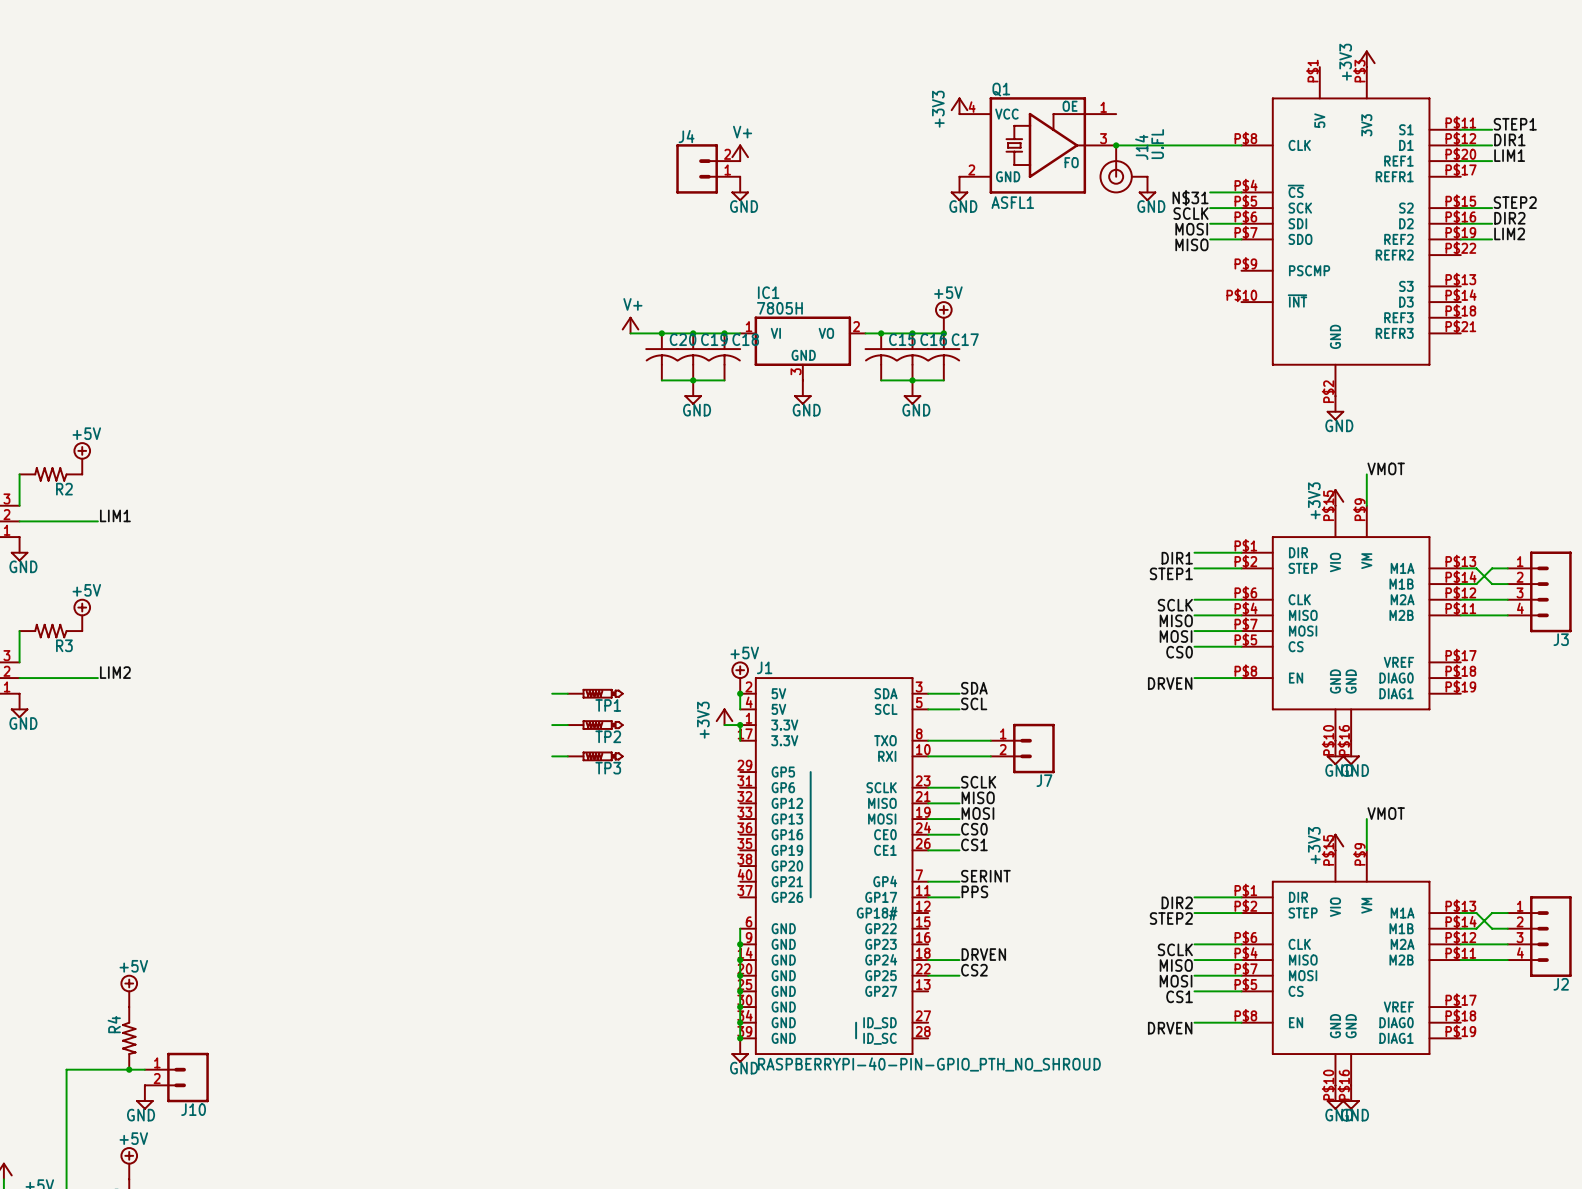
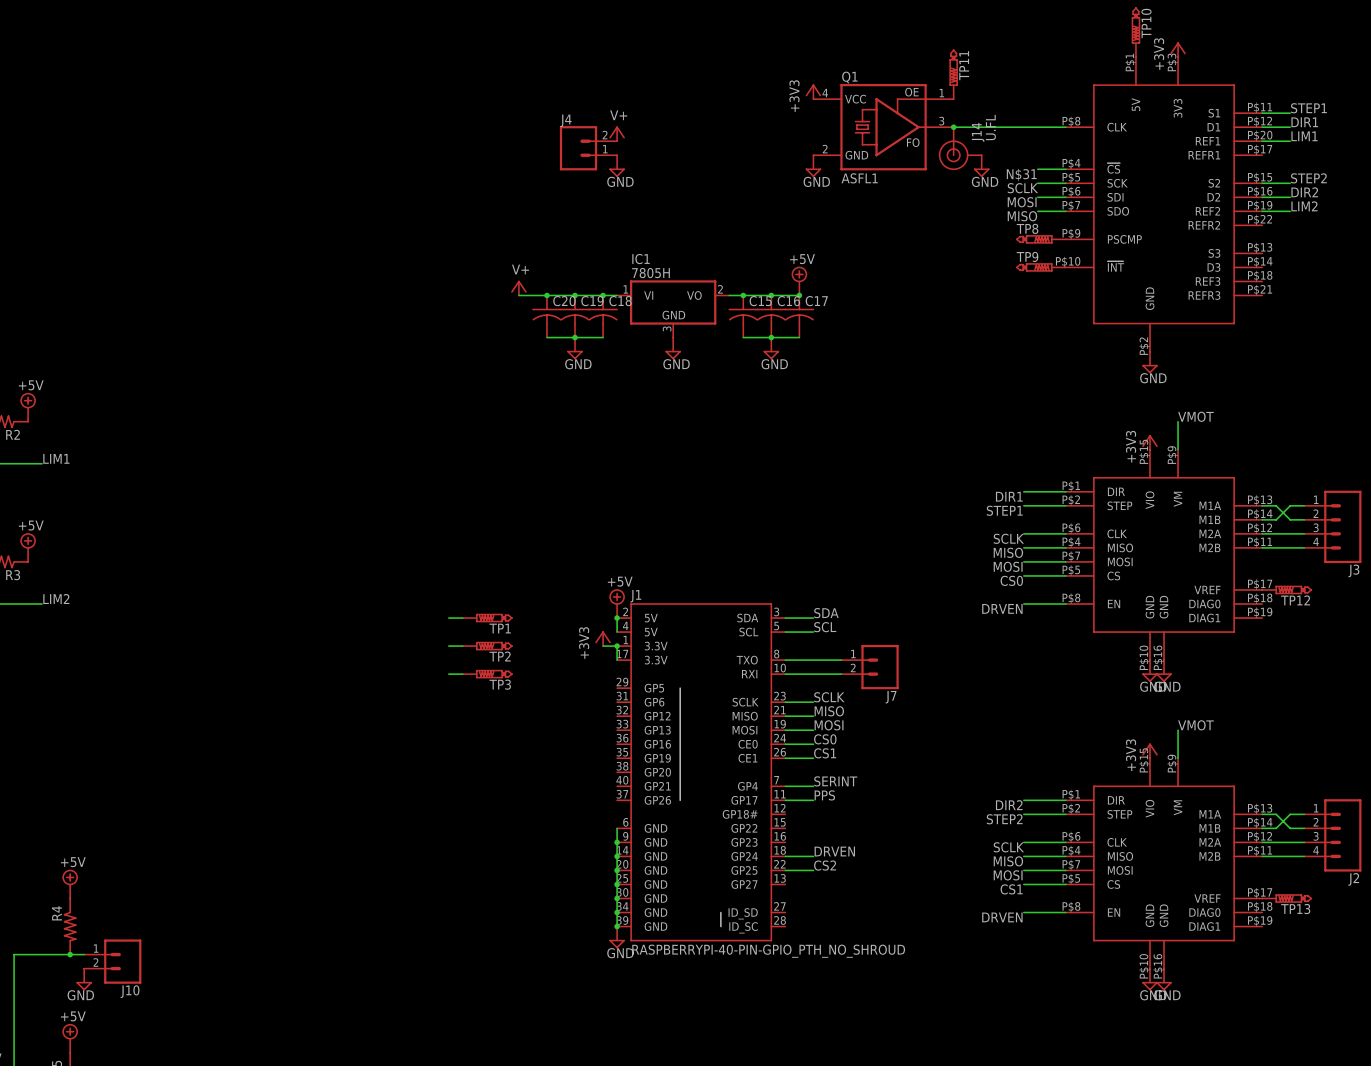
TP10: none -> (1135, 32)
TP11: none -> (953, 74)
TP8: none -> (1041, 239)
TP9: none -> (1041, 267)
TP12: none -> (1286, 589)
TP13: none -> (1286, 898)

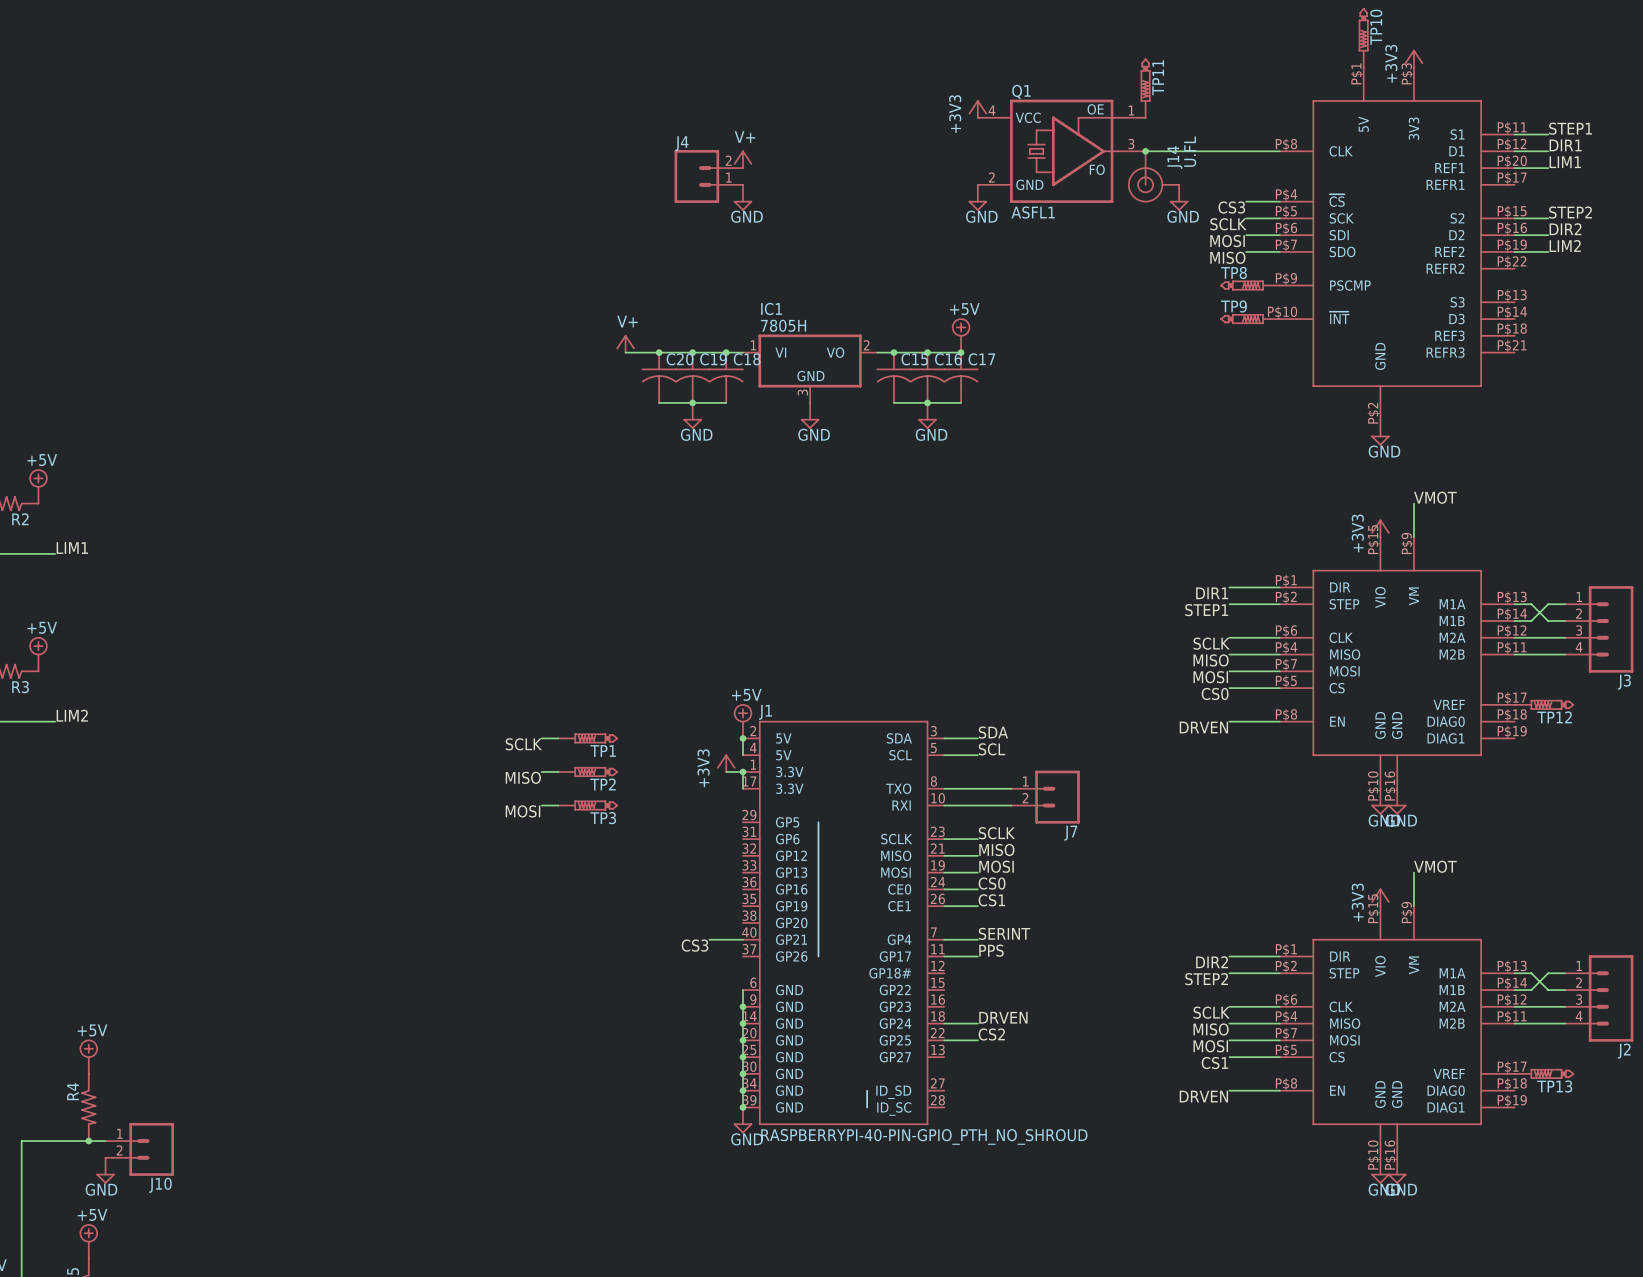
label: N$31 (1021, 174) -> CS3 (1231, 207)
label: none -> SCLK (523, 744)
label: none -> MISO (523, 777)
label: none -> MOSI (523, 811)
wire: none -> (709, 939) (743, 939)
label: none -> CS3 (695, 945)

